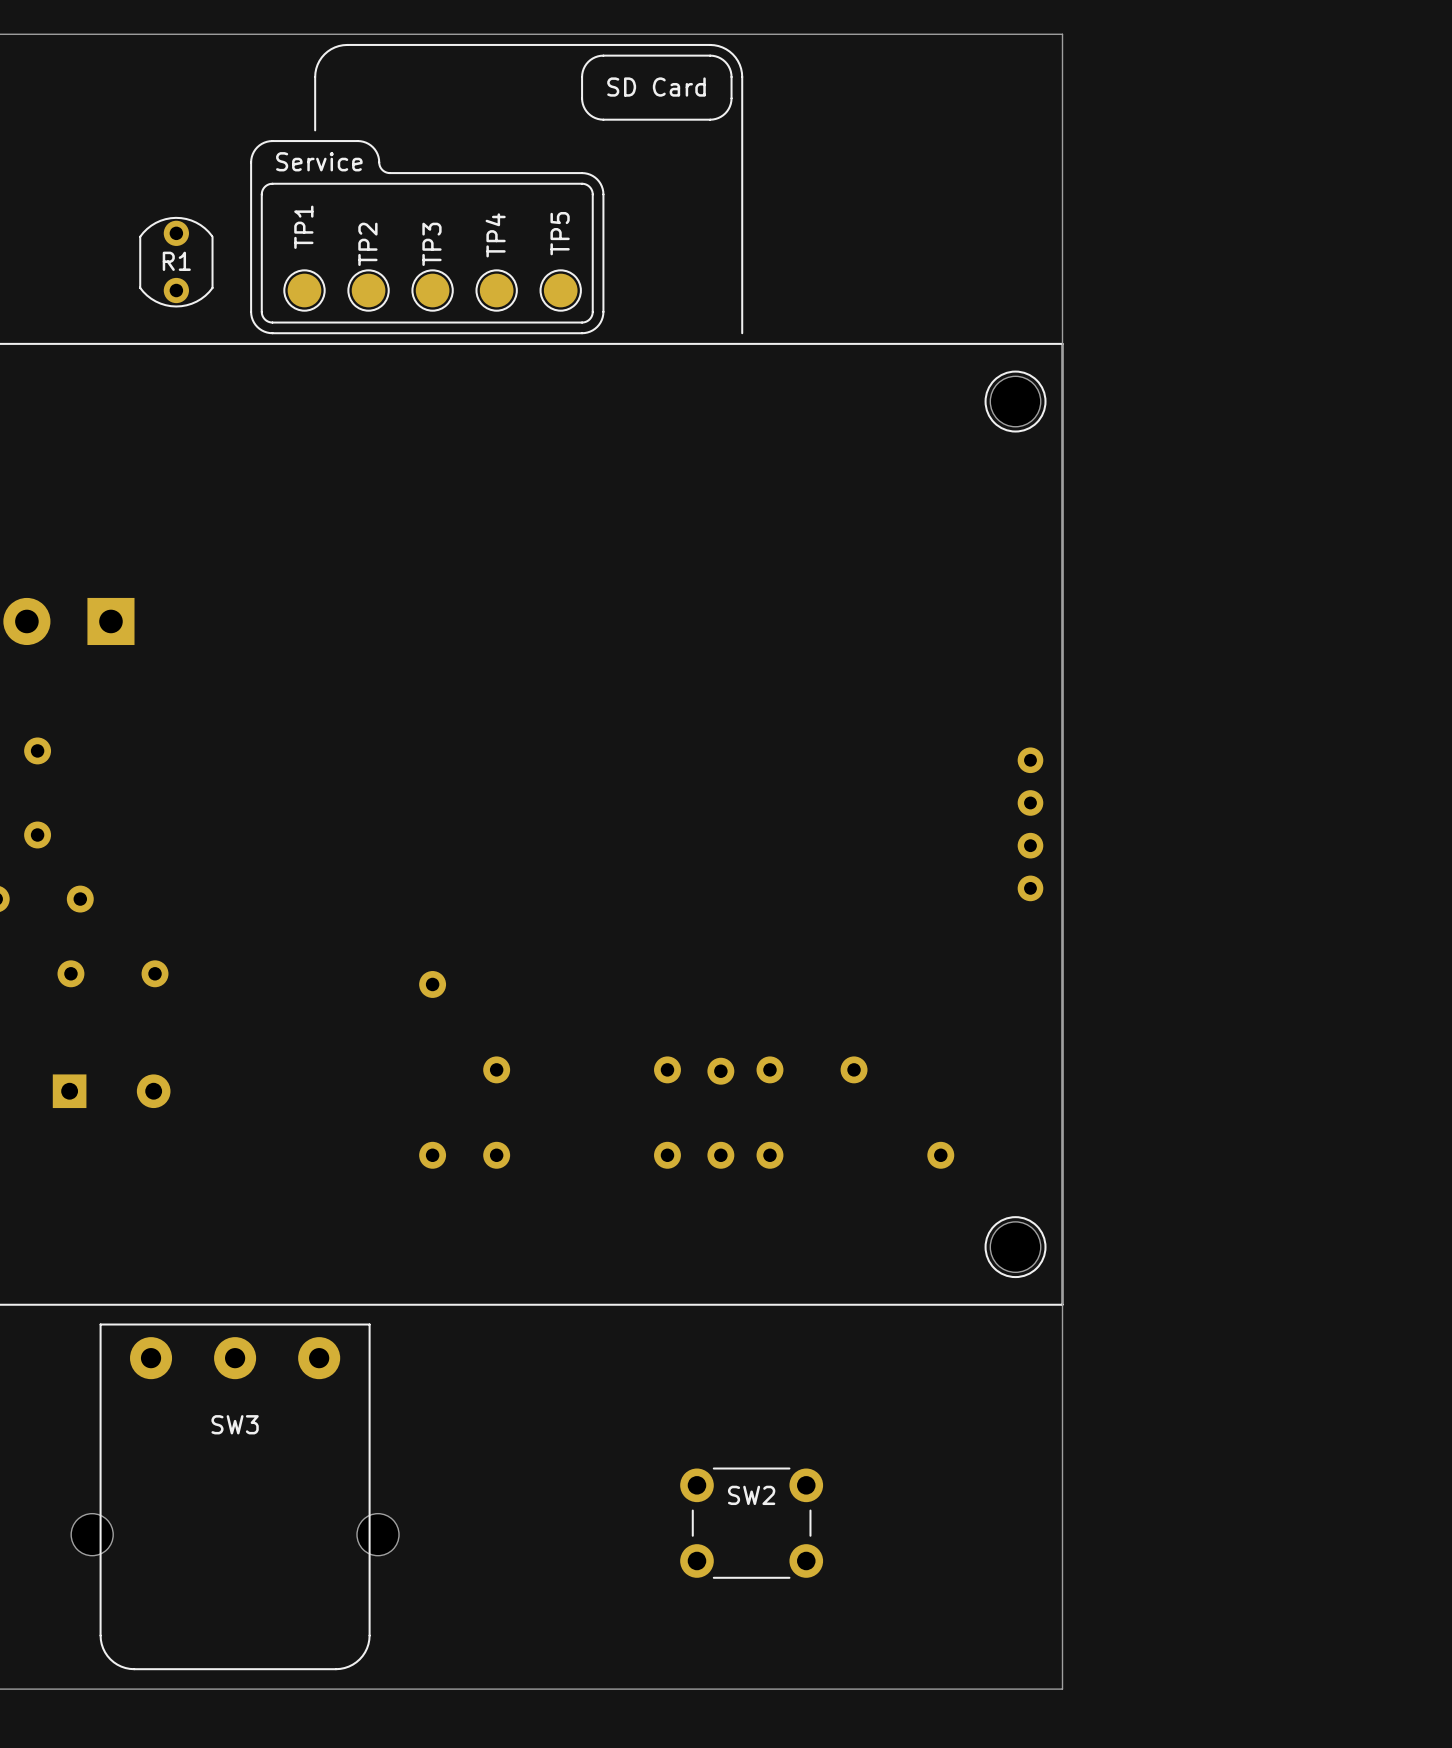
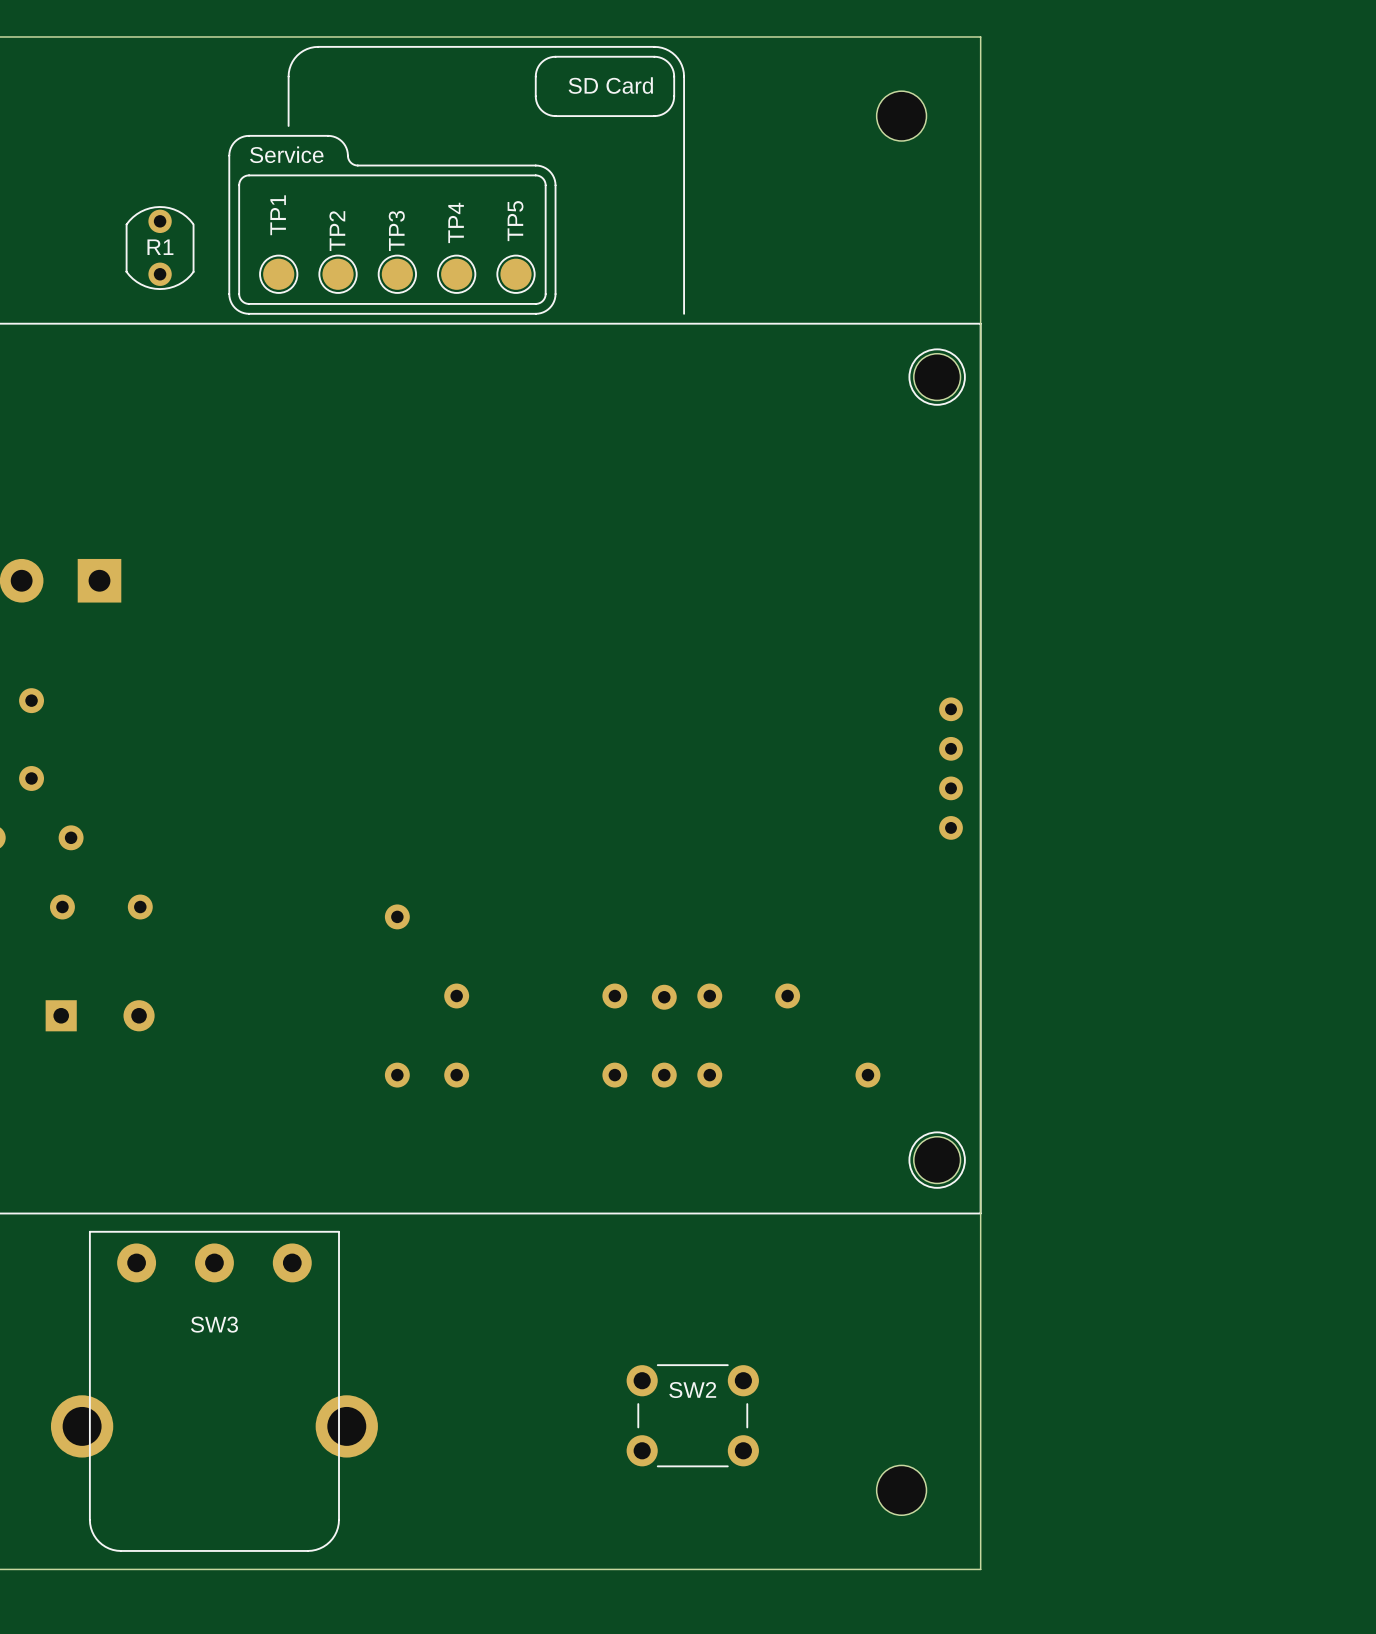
part: none -> (901, 116)
SW3 footprint: [71, 1323, 400, 1671] -> [50, 1230, 378, 1552]
part: none -> (901, 1490)

